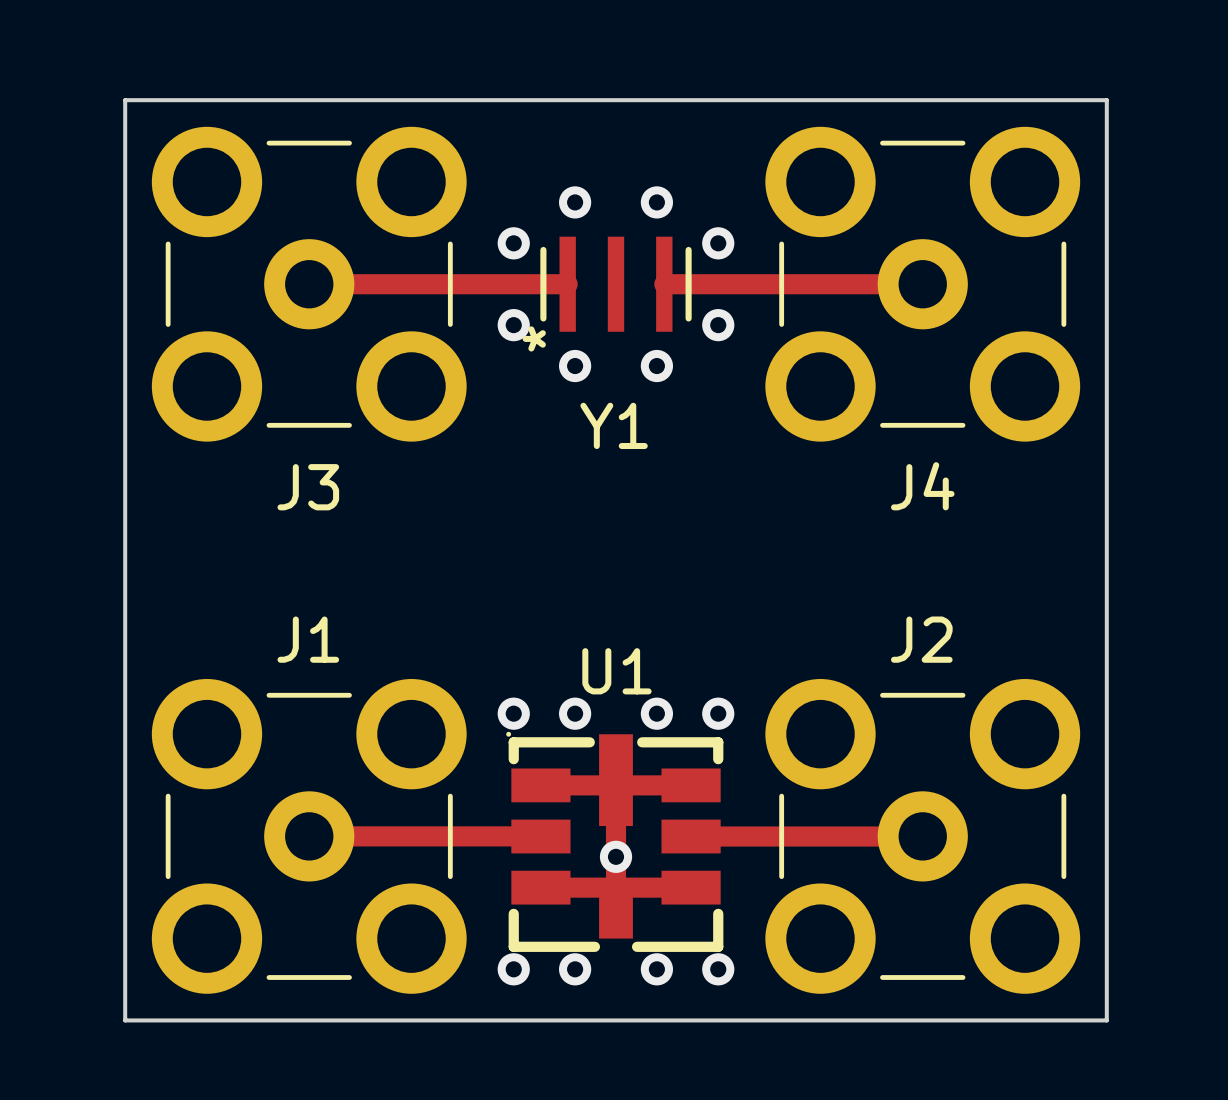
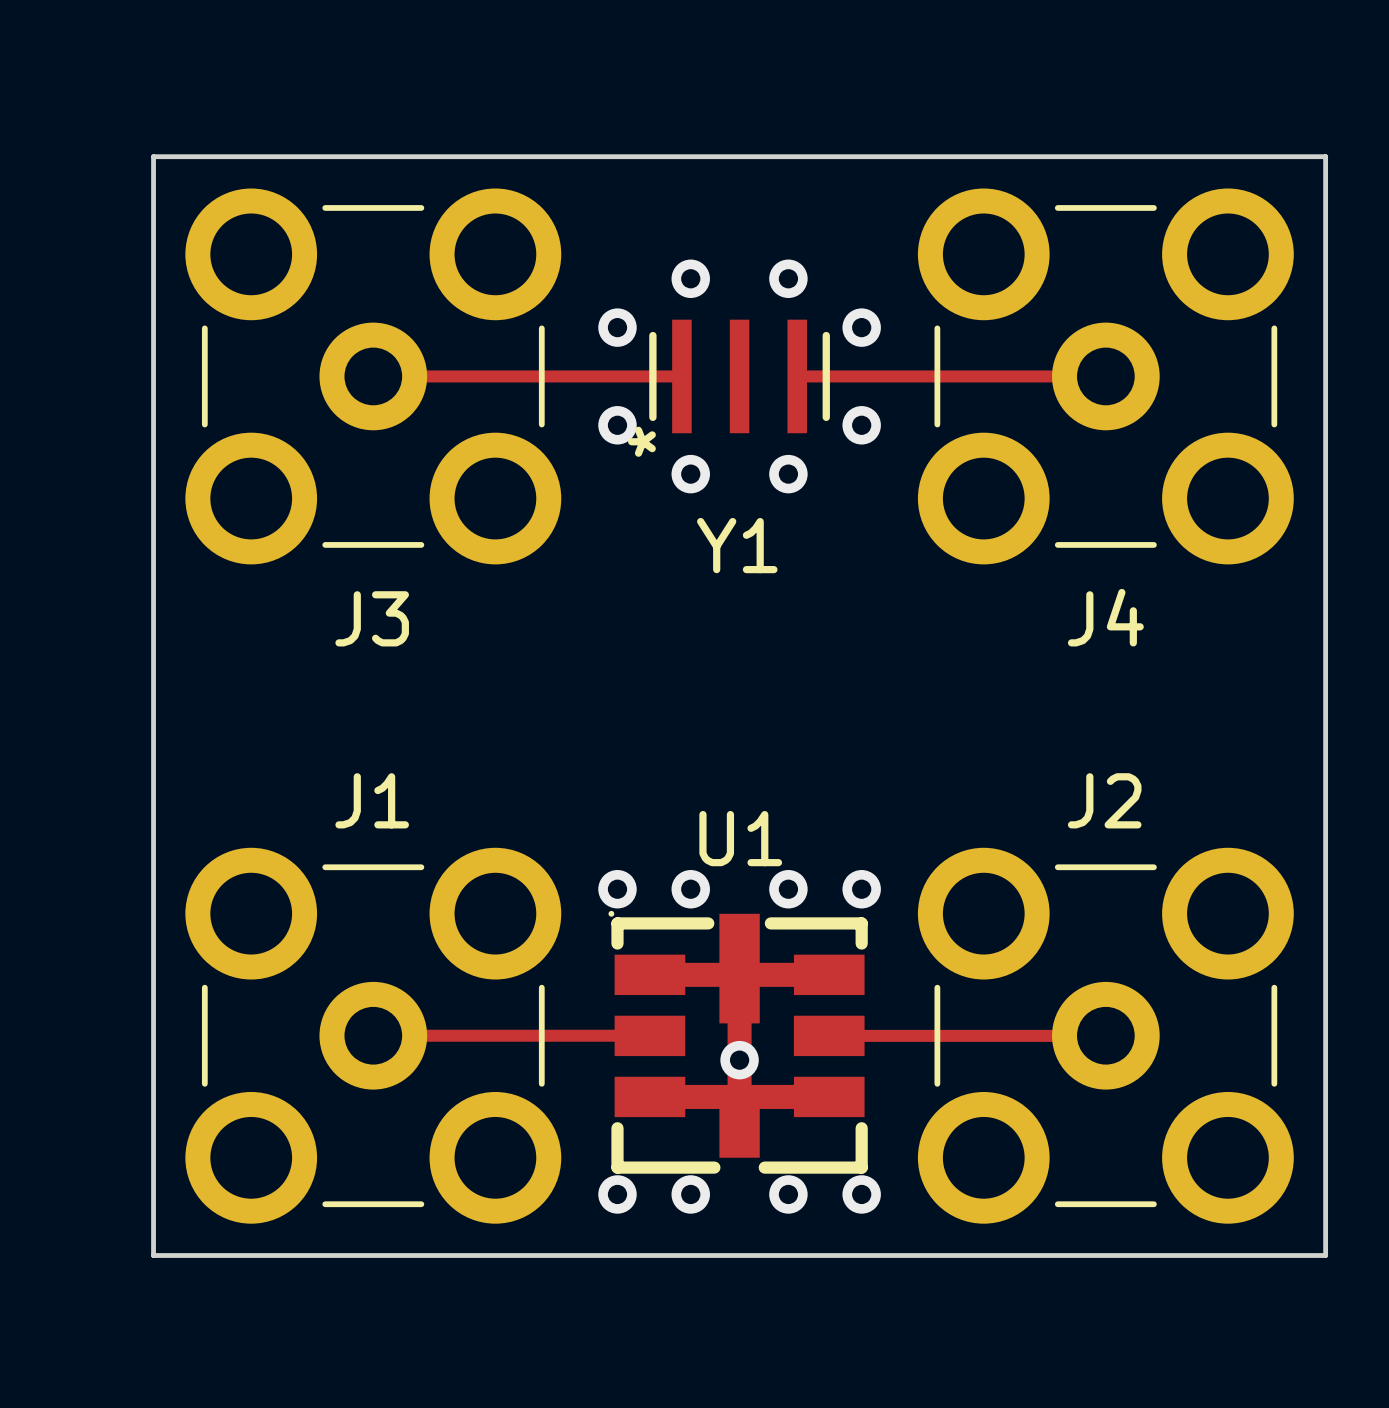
track width: thick (309, 284) (567, 284) -> thin (373, 376) (681, 376)
track width: thick (664, 284) (922, 284) -> thin (797, 376) (1105, 376)
track width: thick (309, 836) (540, 836) -> thin (373, 1035) (649, 1035)
track width: thick (691, 836) (922, 836) -> thin (829, 1035) (1105, 1035)

